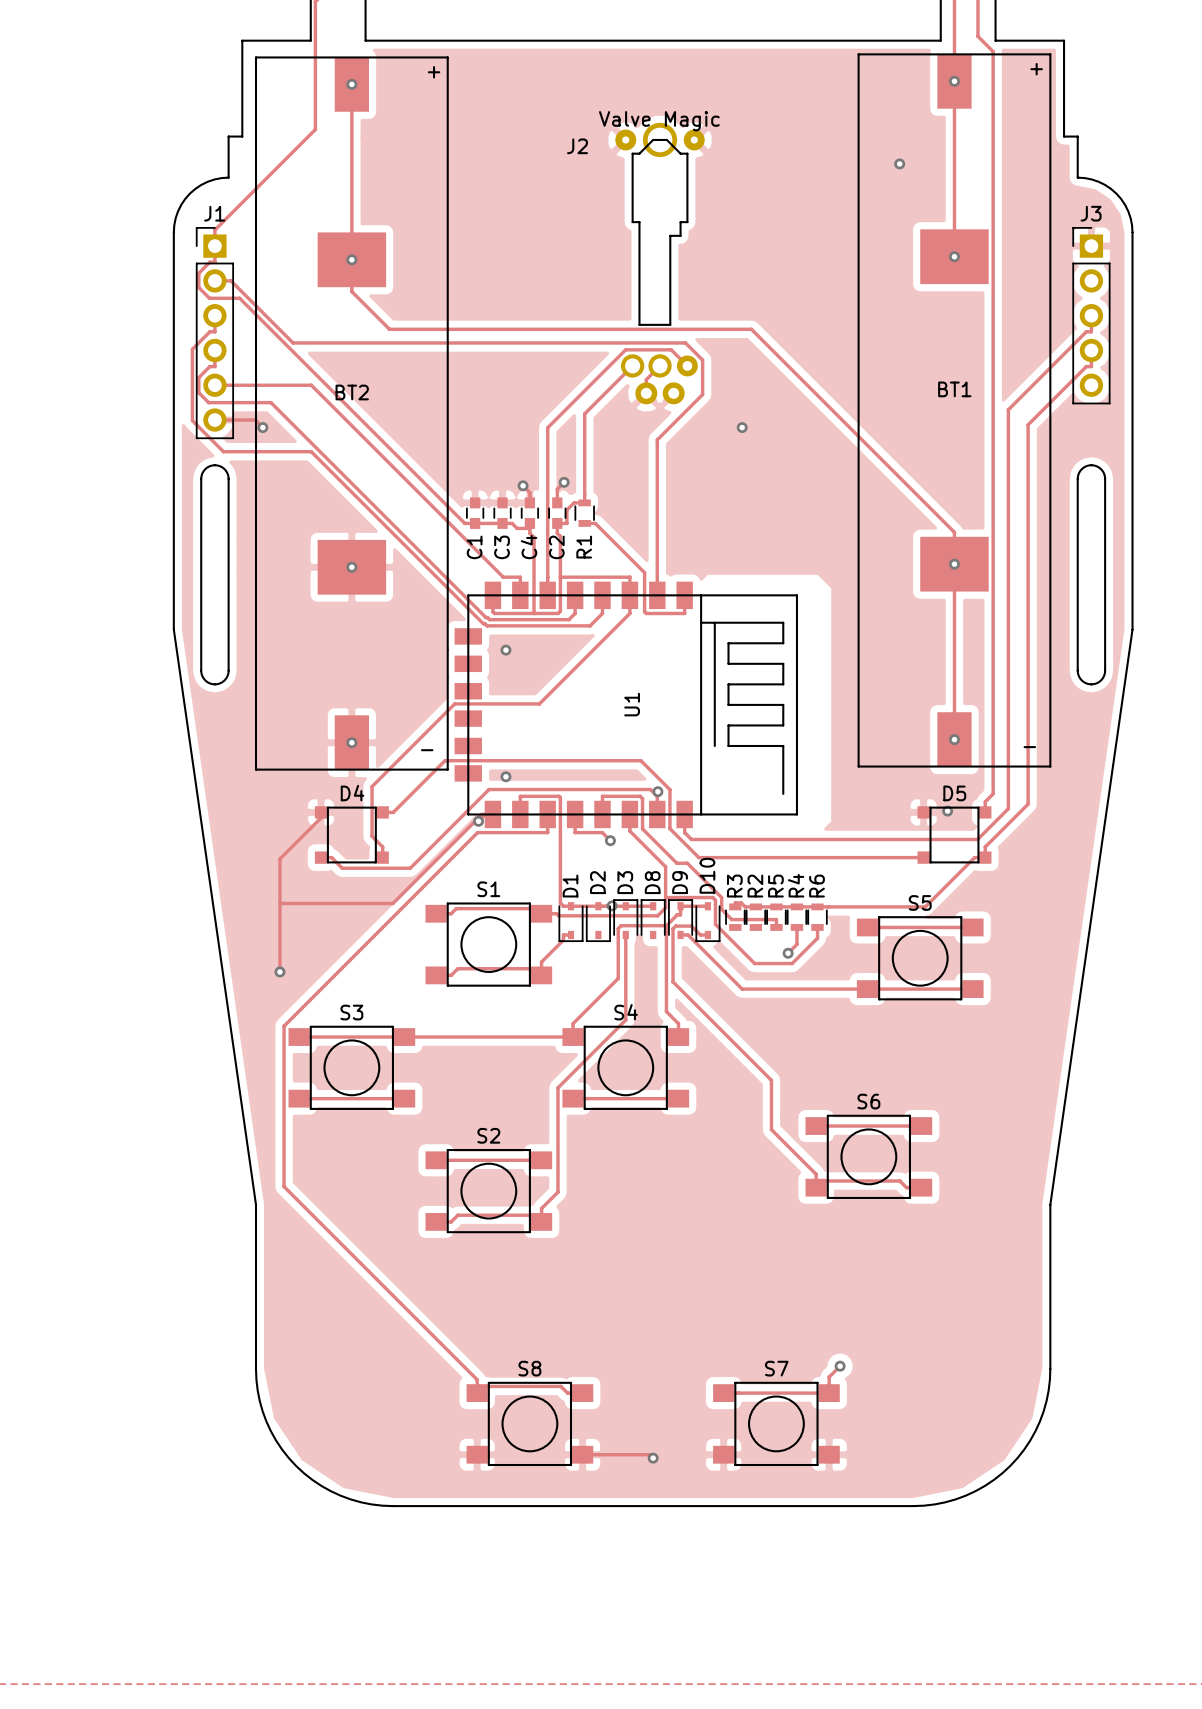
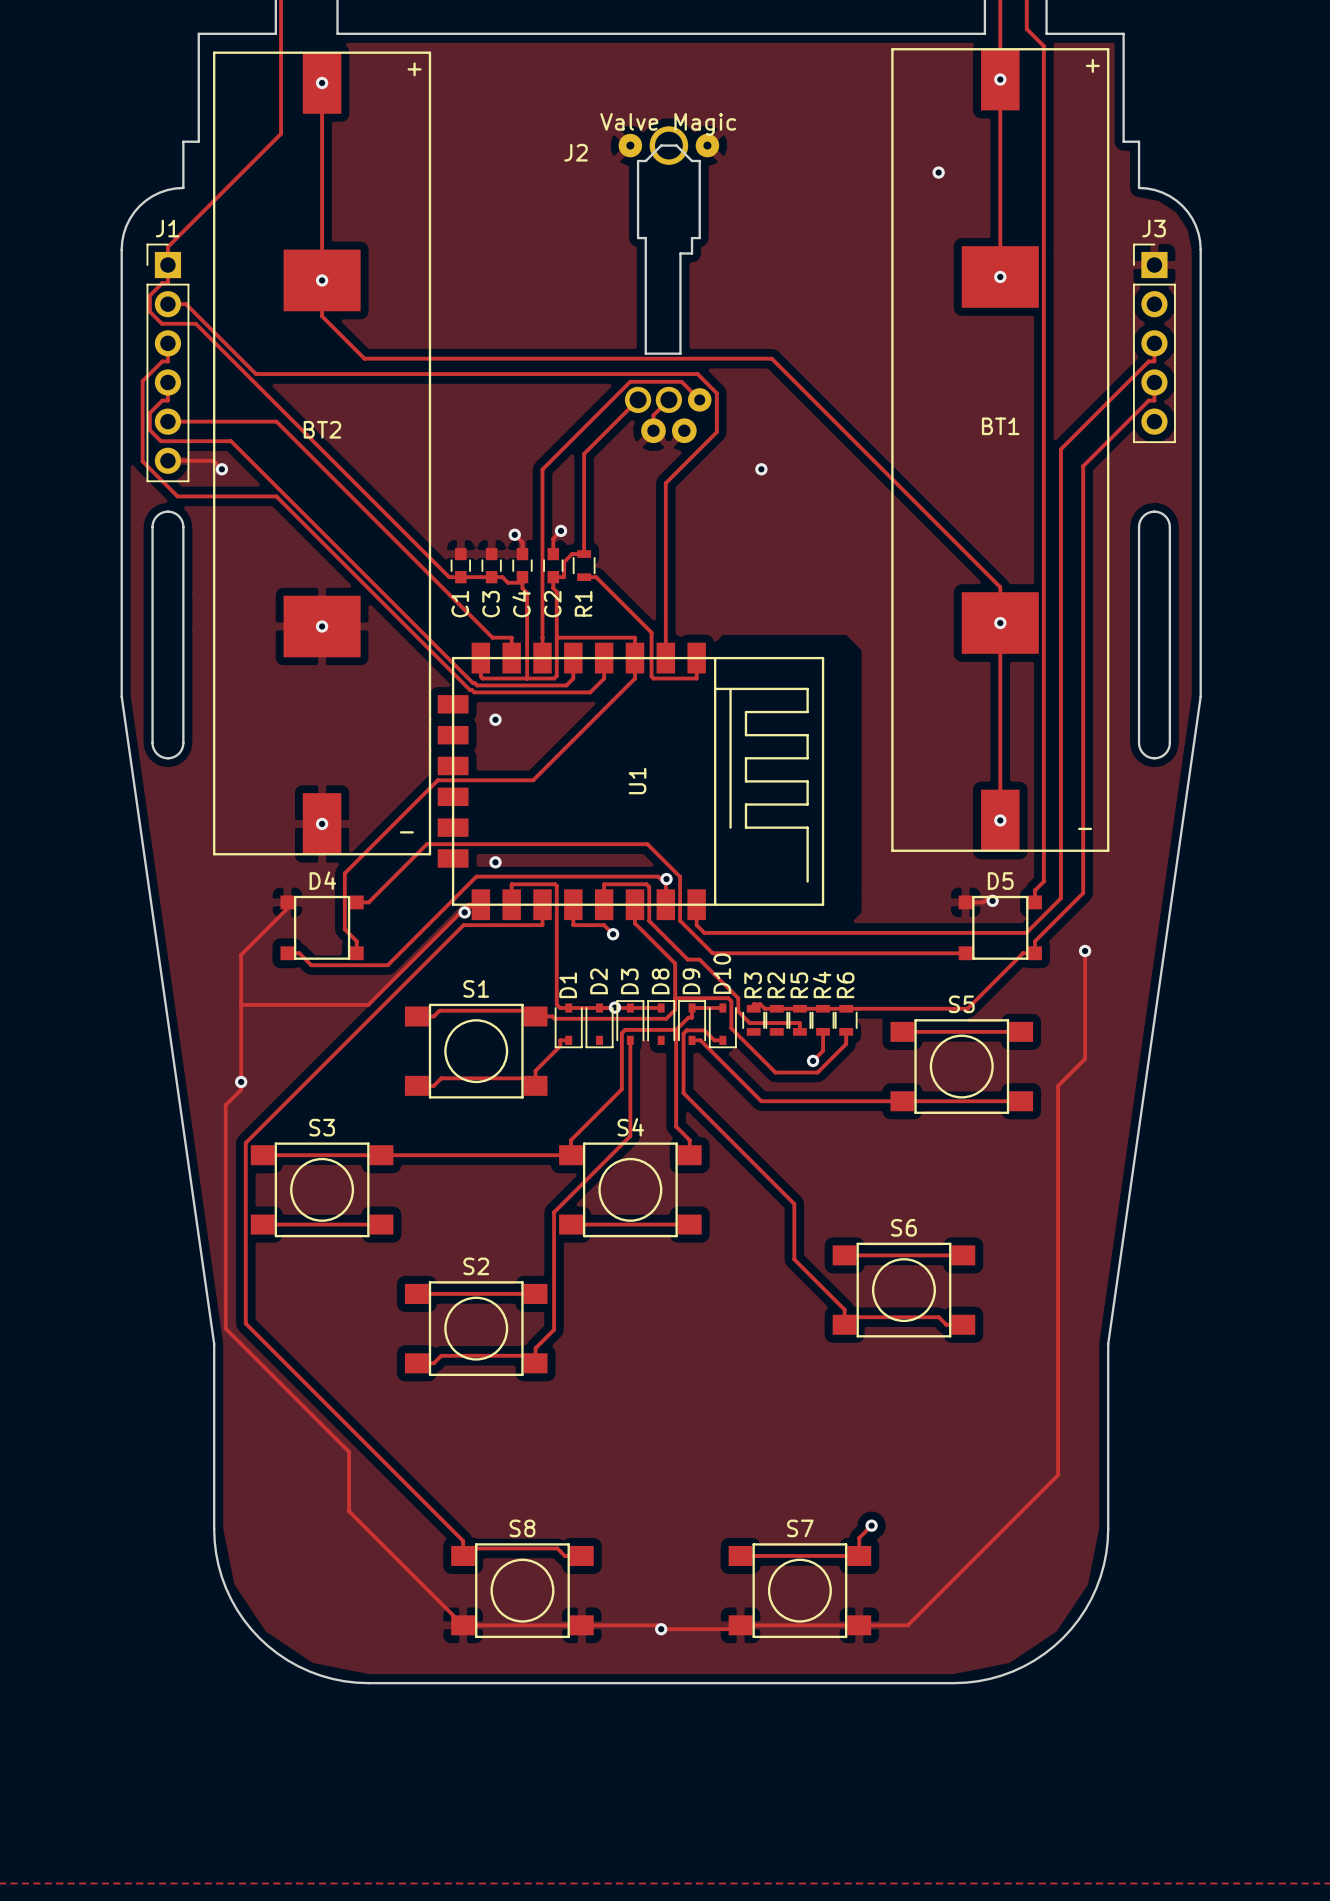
track: none -> (988, 897) (983, 902) (965, 902)
track: none -> (1085, 950) (1085, 1058) (1058, 1085) (1058, 1475) (907, 1625) (740, 1625) (736, 1629) (661, 1629)
via: none -> (1085, 950)
track: none -> (241, 1081) (241, 1089) (225, 1105) (225, 1328) (349, 1451) (349, 1511) (463, 1625) (581, 1625)

